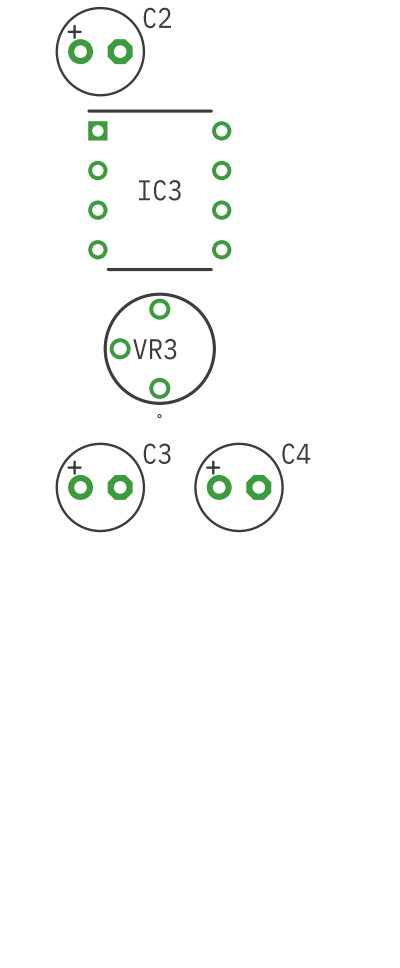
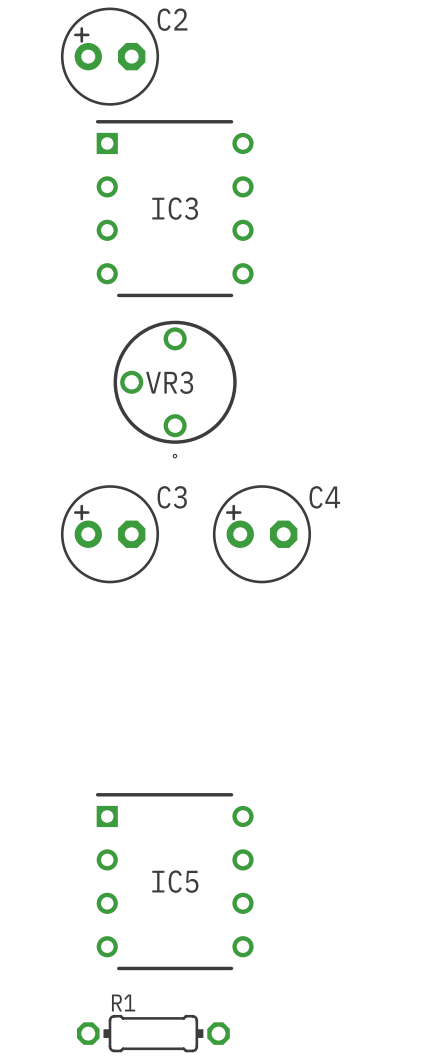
IC5: none -> (174, 881)
R1: none -> (153, 1033)

